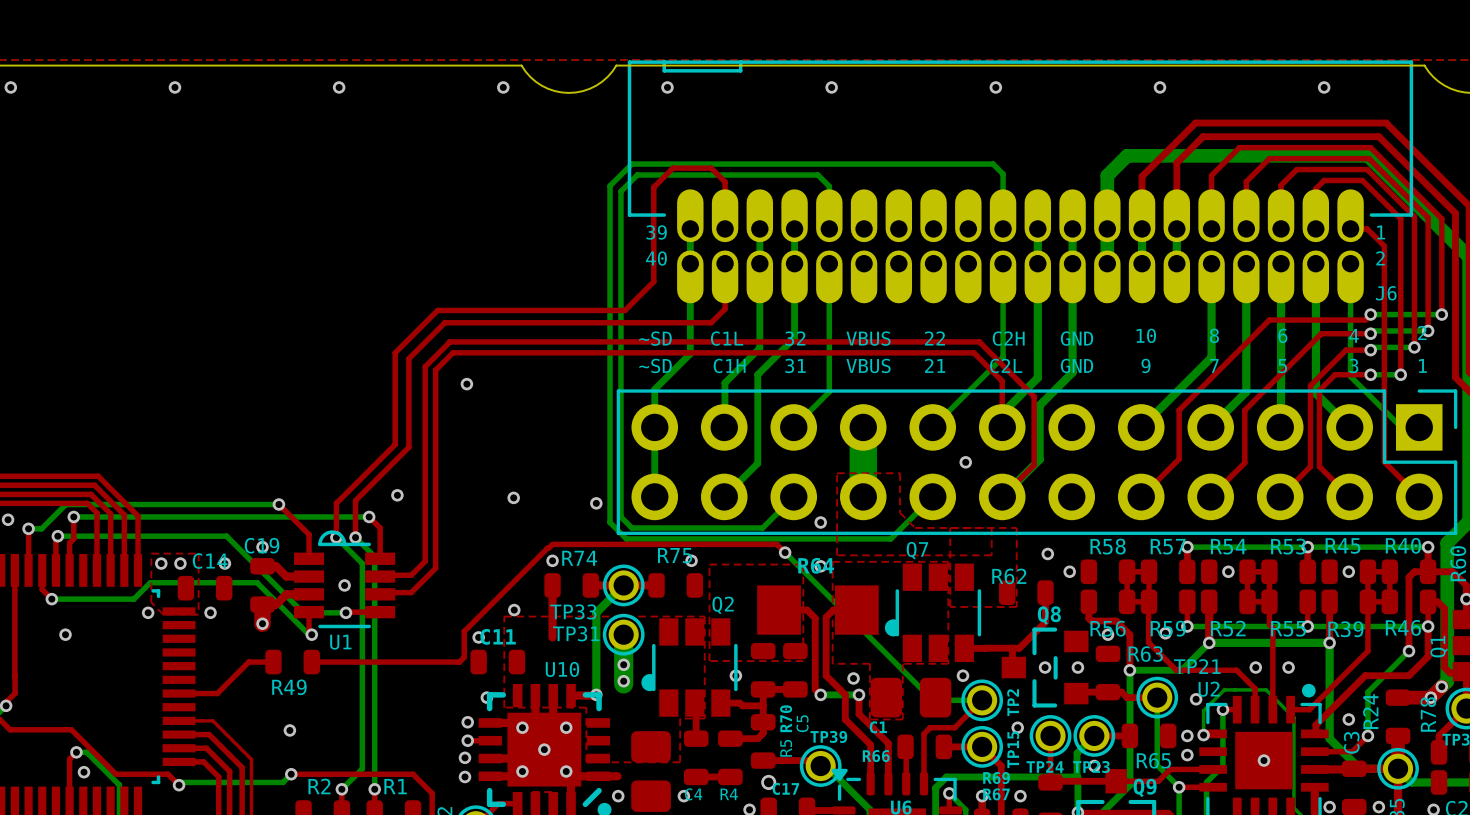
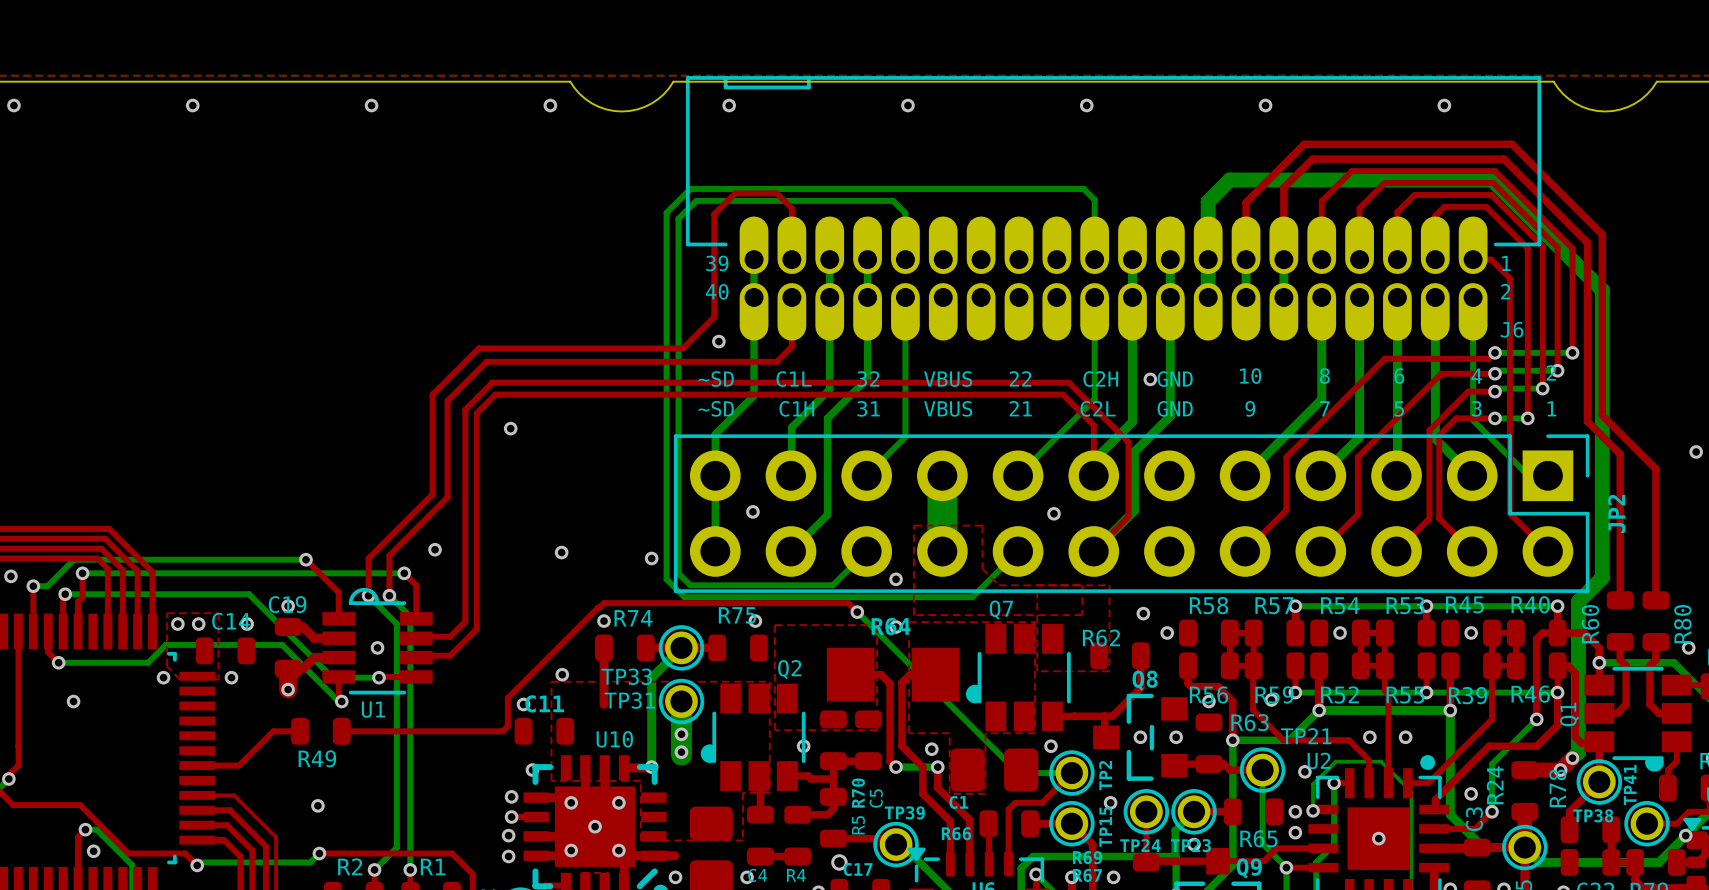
via: none -> (718, 341)
via: none -> (1150, 379)
via: none -> (752, 511)

